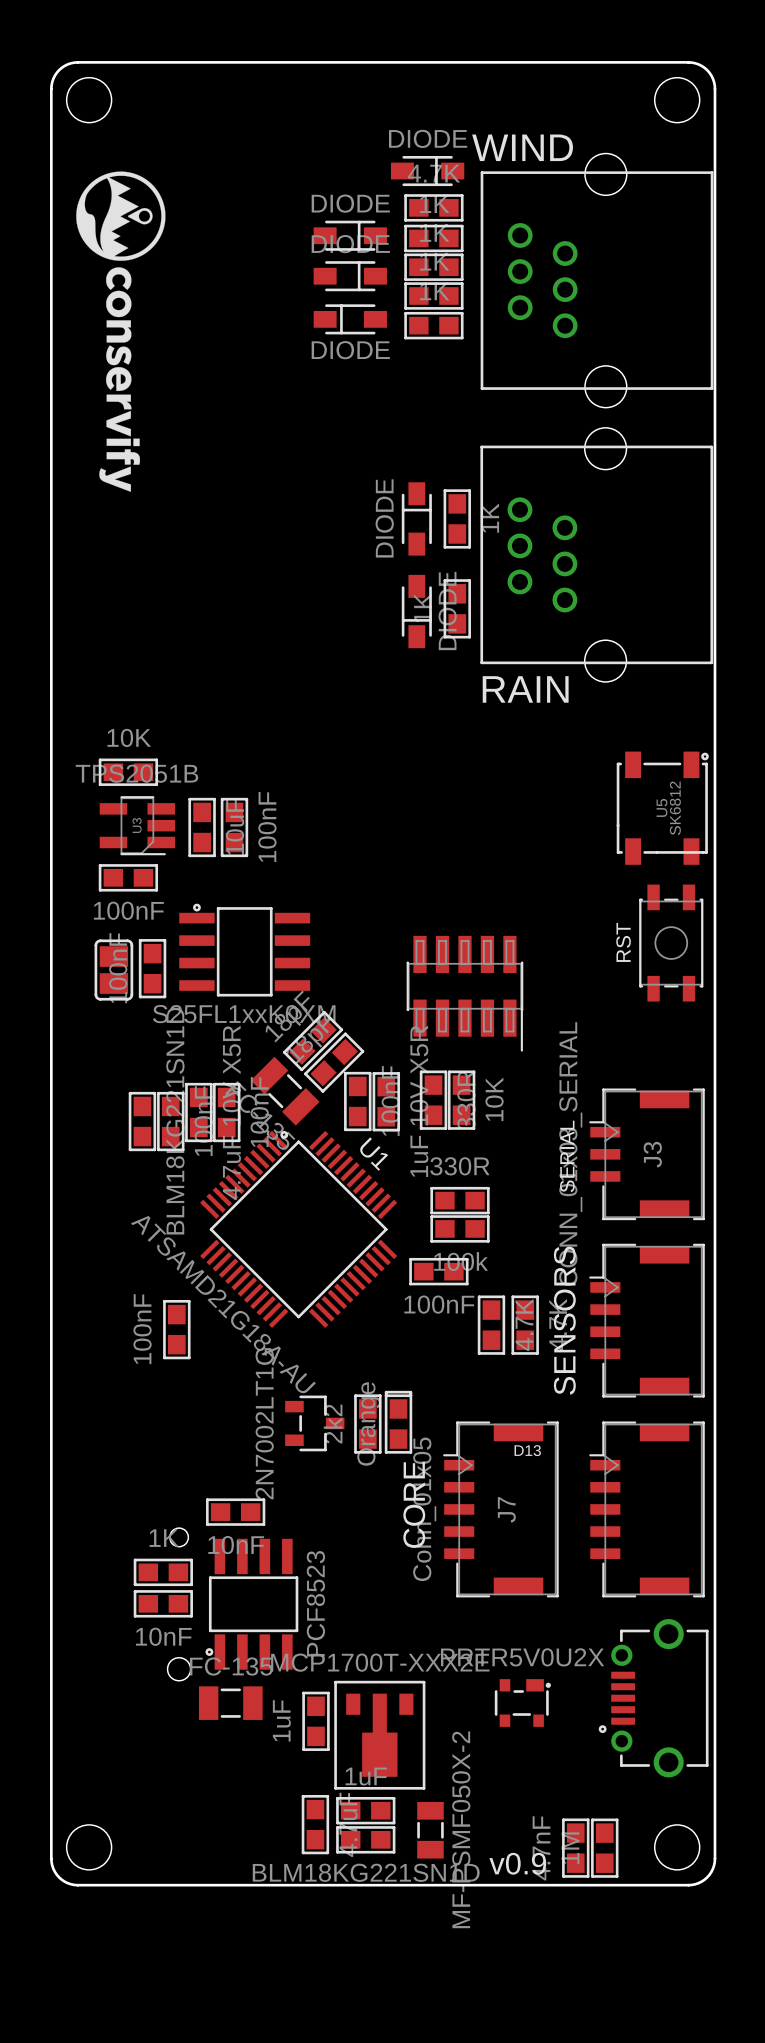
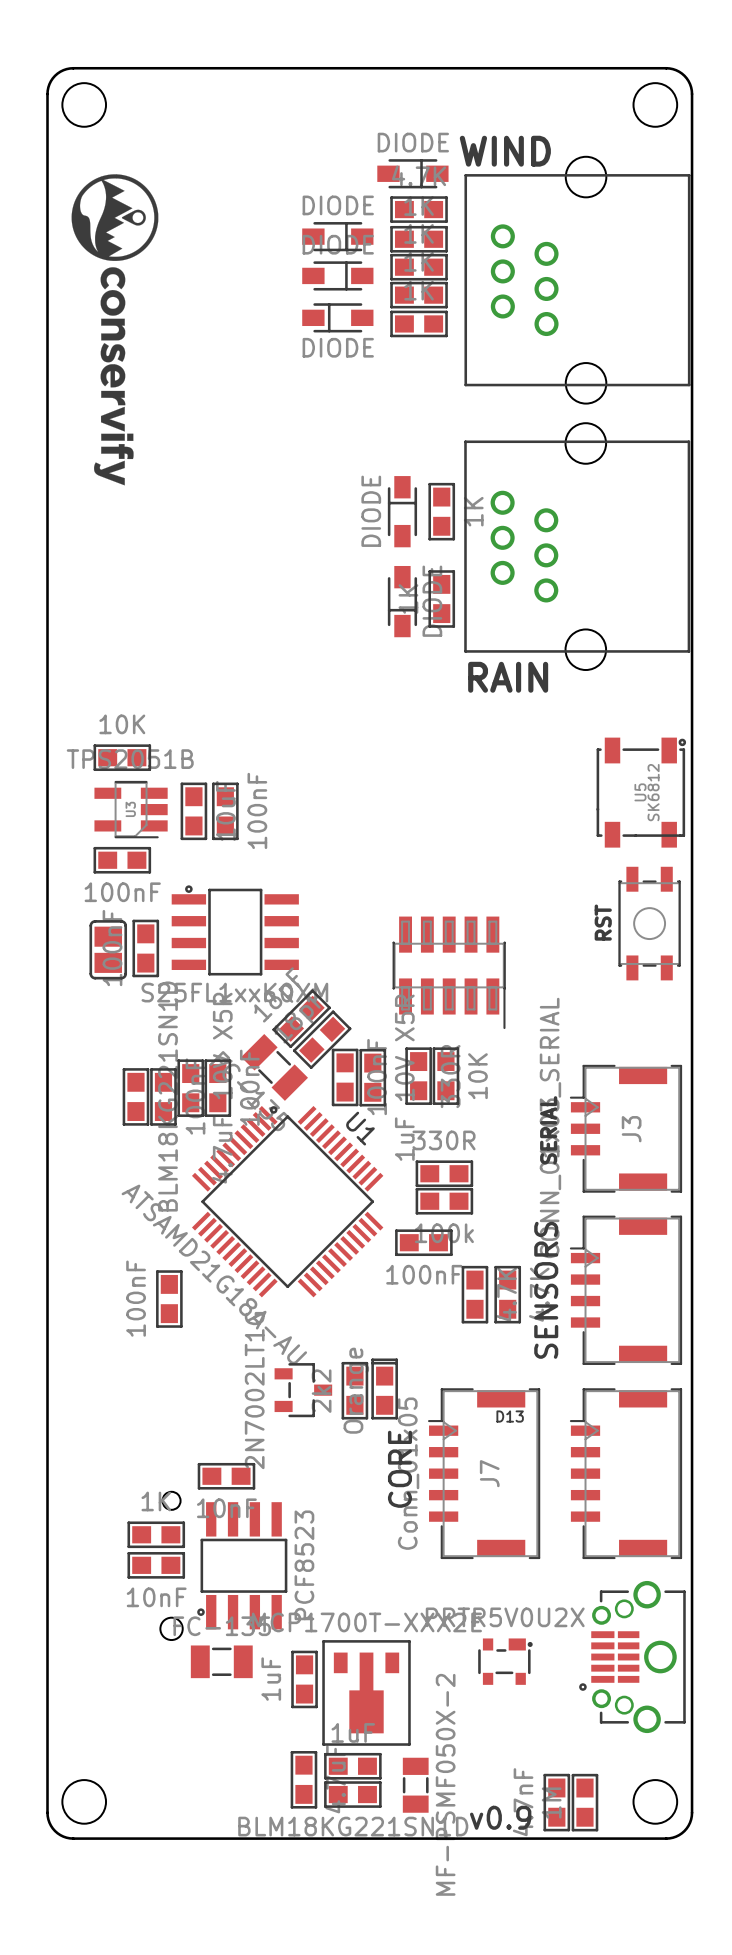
part footprint: [598, 1619, 709, 1778] -> [579, 1580, 686, 1734]

